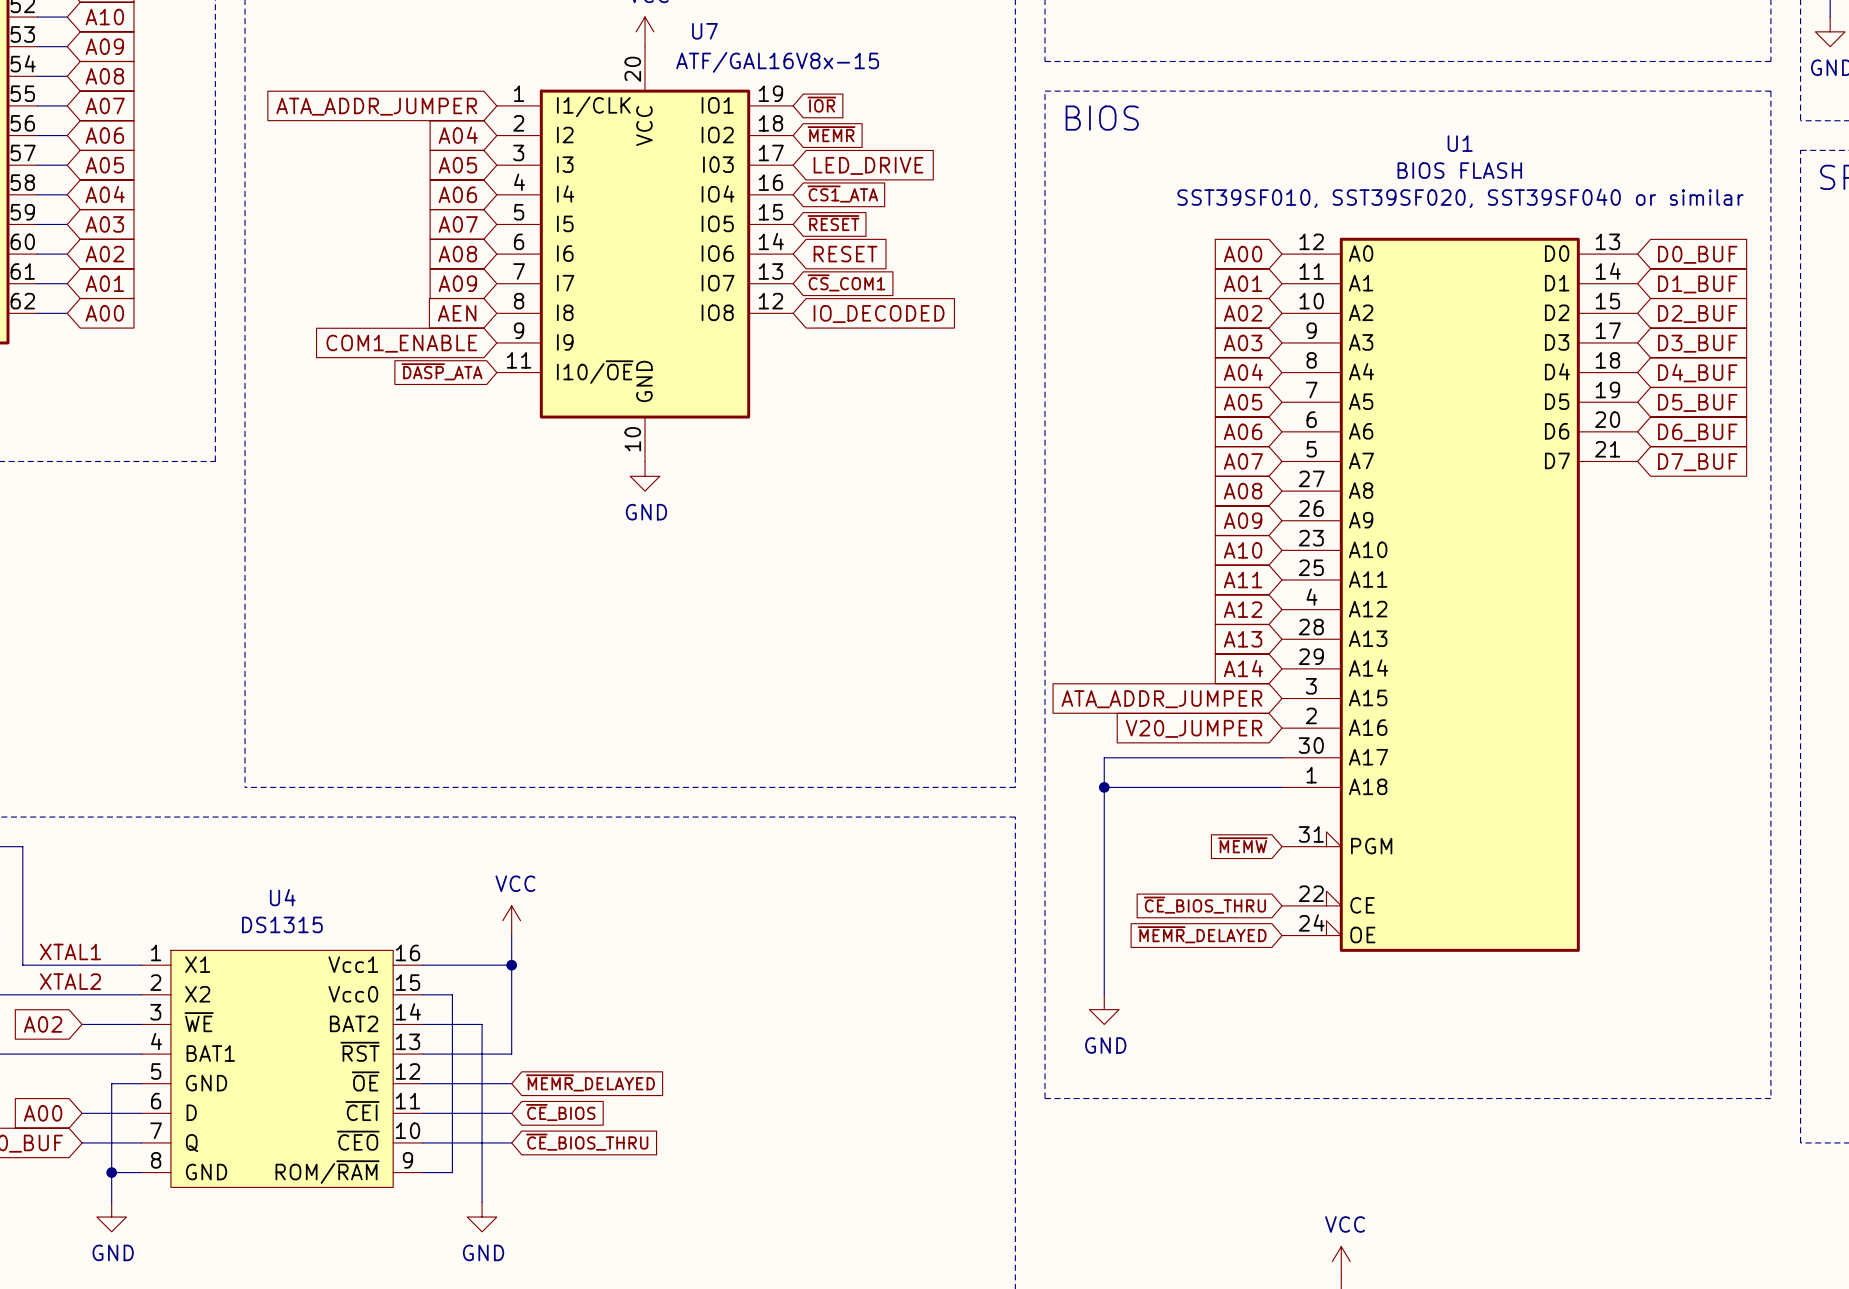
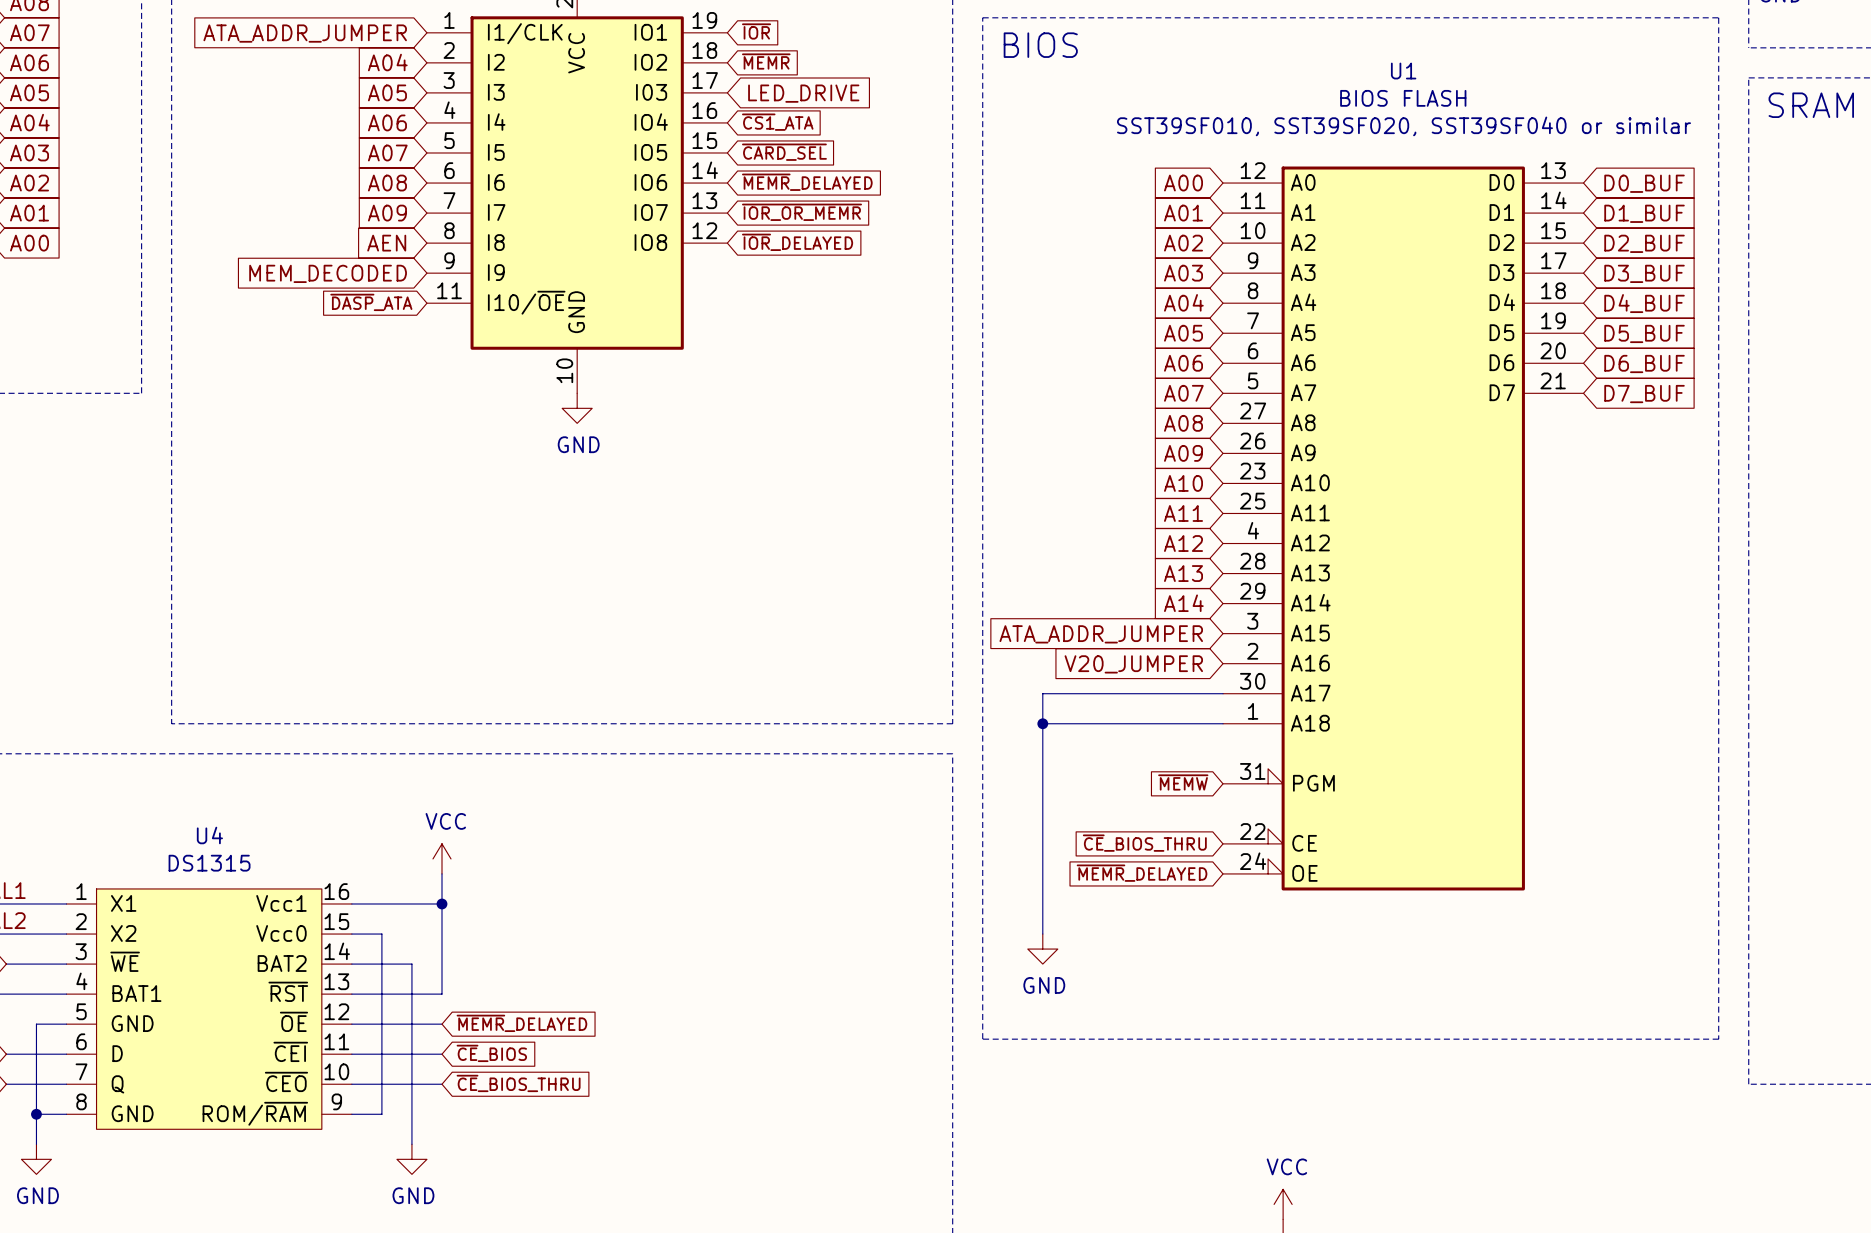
global label: ~{RESET} (833, 223) -> ~{CARD_SEL} (784, 152)
global label: RESET (845, 254) -> ~{MEMR}_DELAYED (807, 182)
global label: ~{CS}_COM1 (846, 282) -> ~{IOR_OR_MEMR} (801, 212)
global label: IO_DECODED (879, 314) -> ~{IOR}_DELAYED (797, 242)
global label: COM1_ENABLE (401, 343) -> MEM_DECODED (328, 273)

